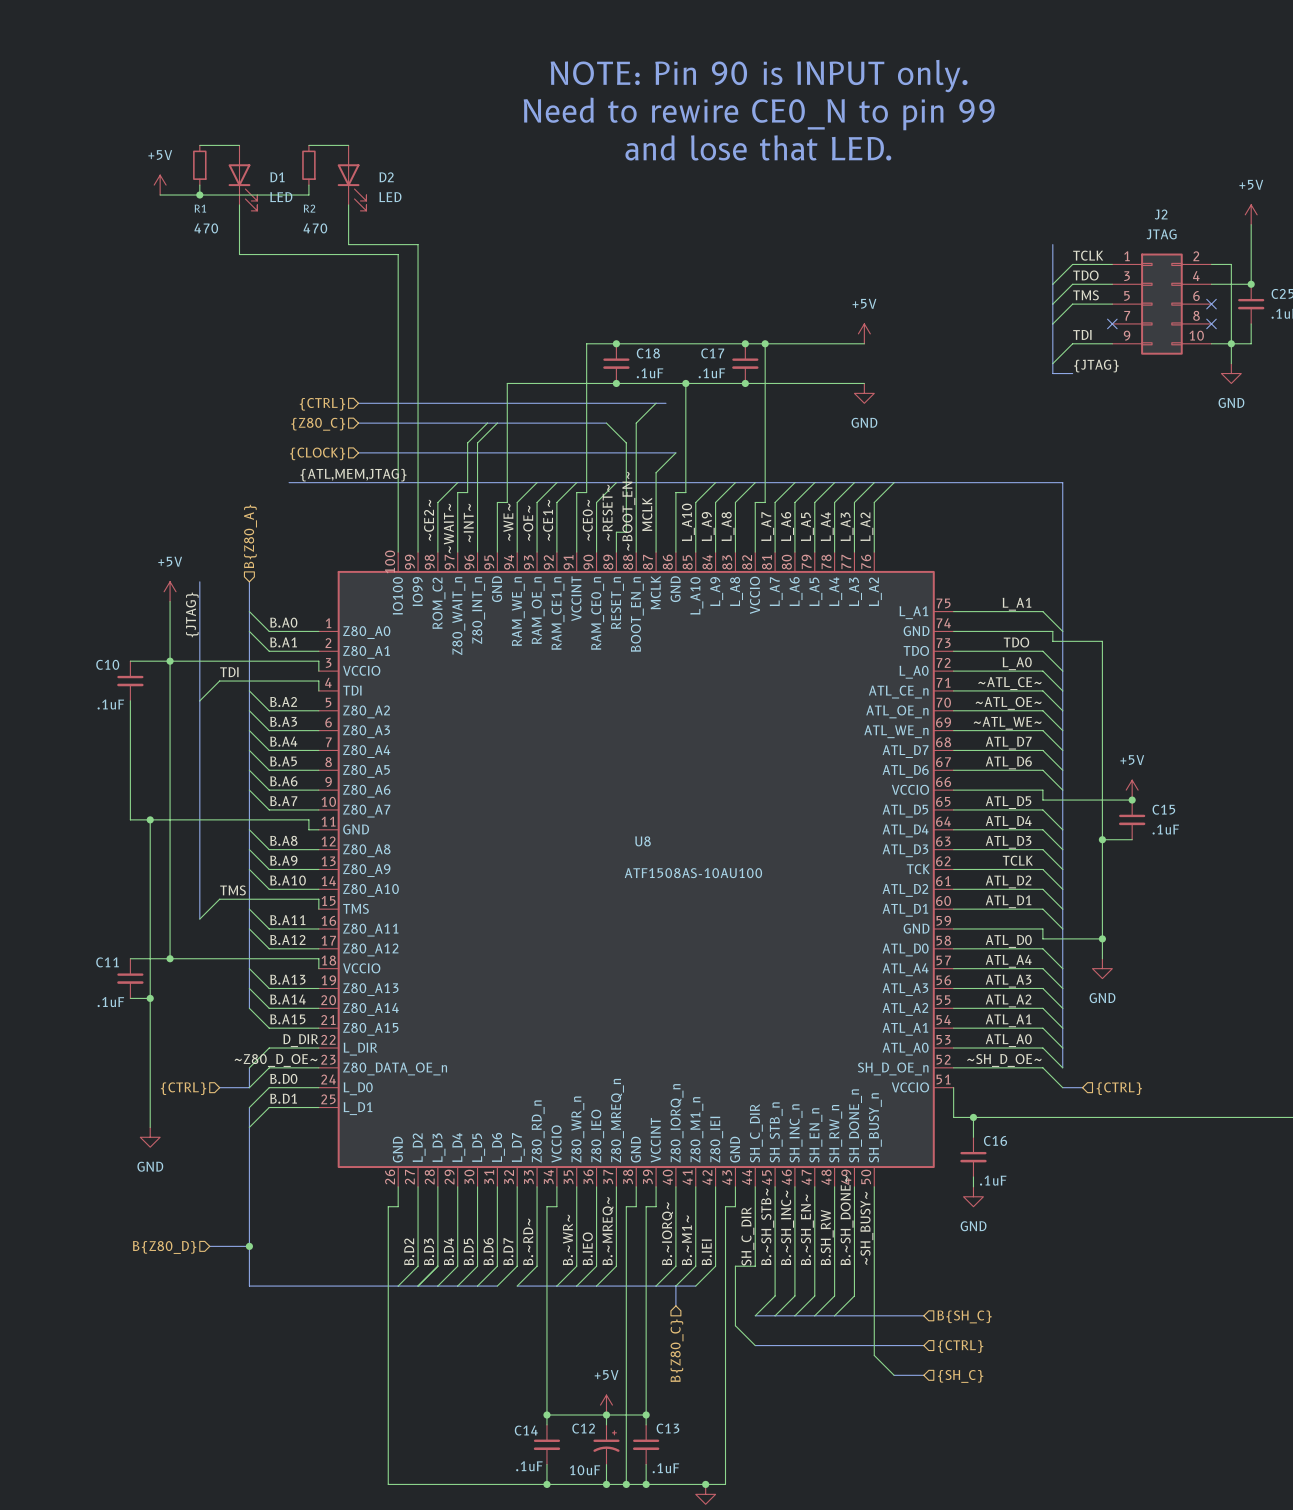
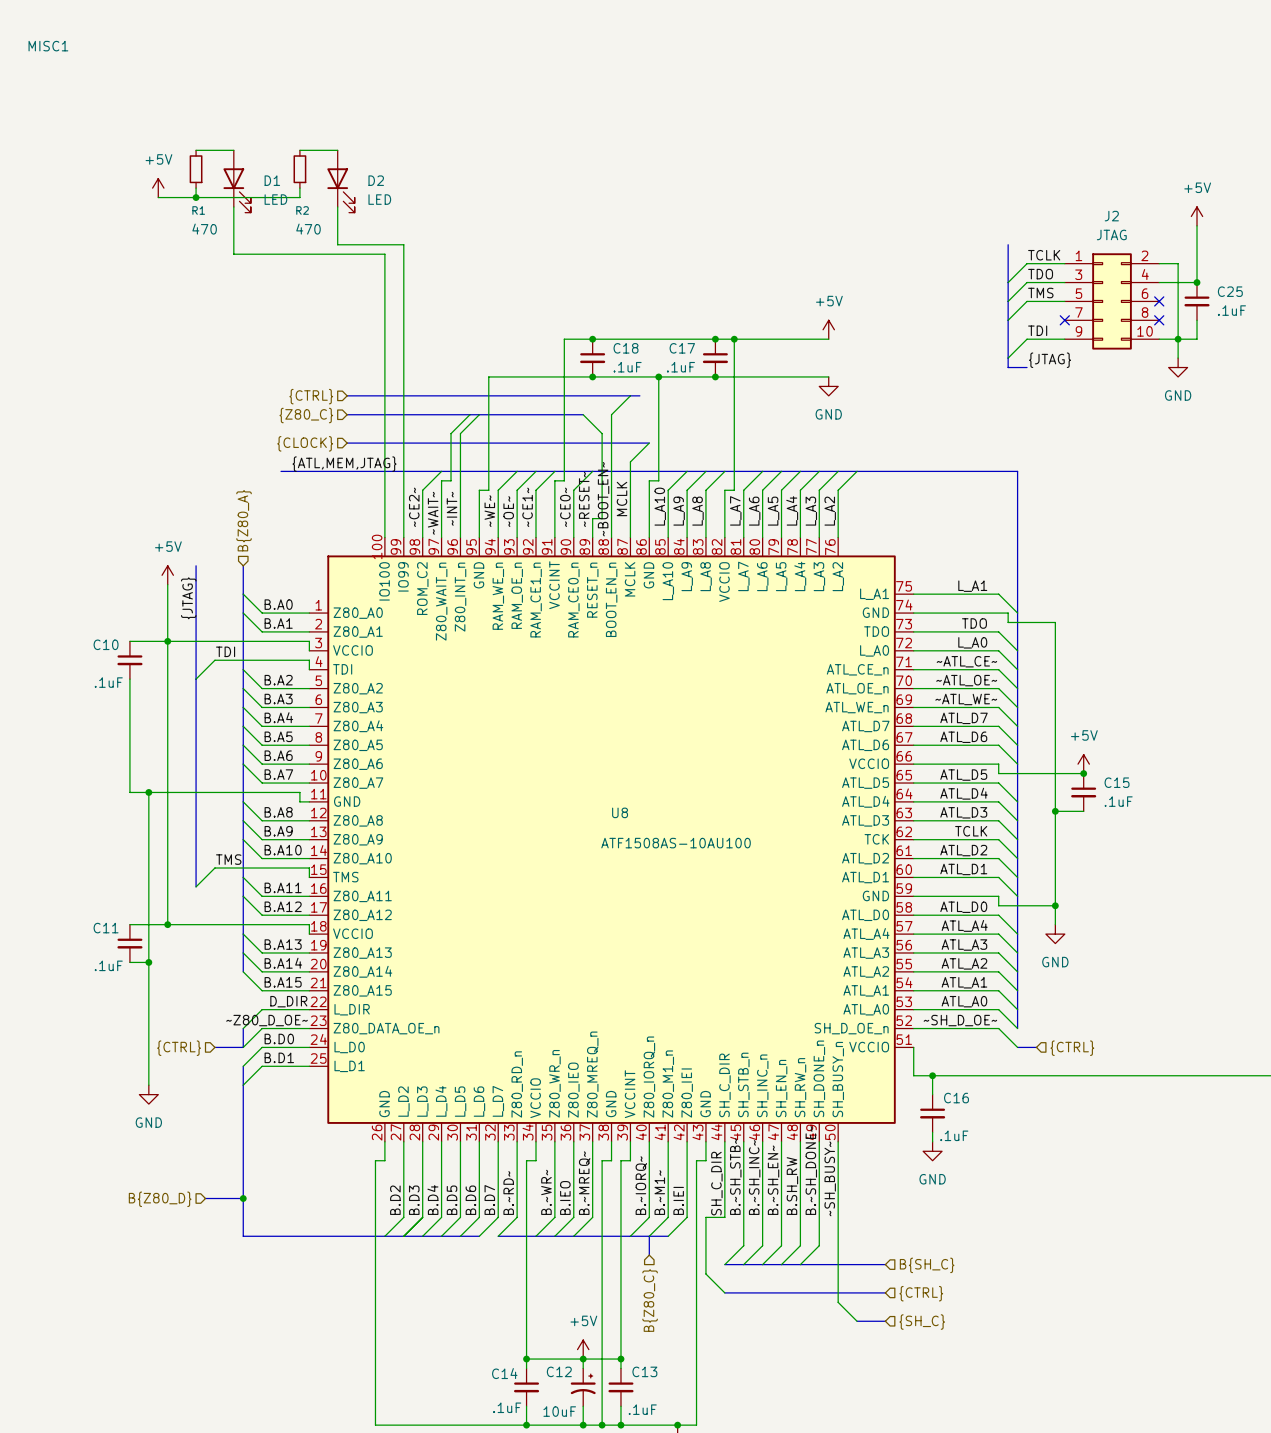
MISC1: none -> (48, 46)
text: NOTE: Pin 90 is INPUT only. (759, 76) -> none
text: Need to rewire CE0_N to pin 99 (759, 113) -> none
text: and lose that LED. (758, 147) -> none

